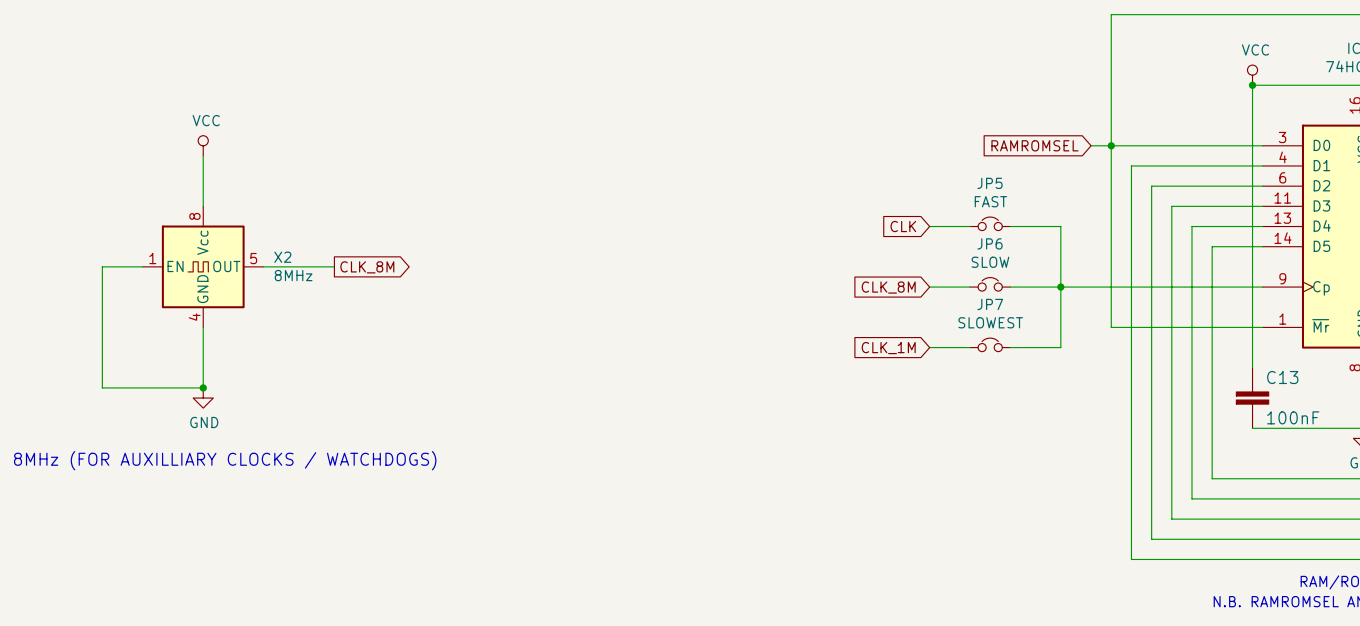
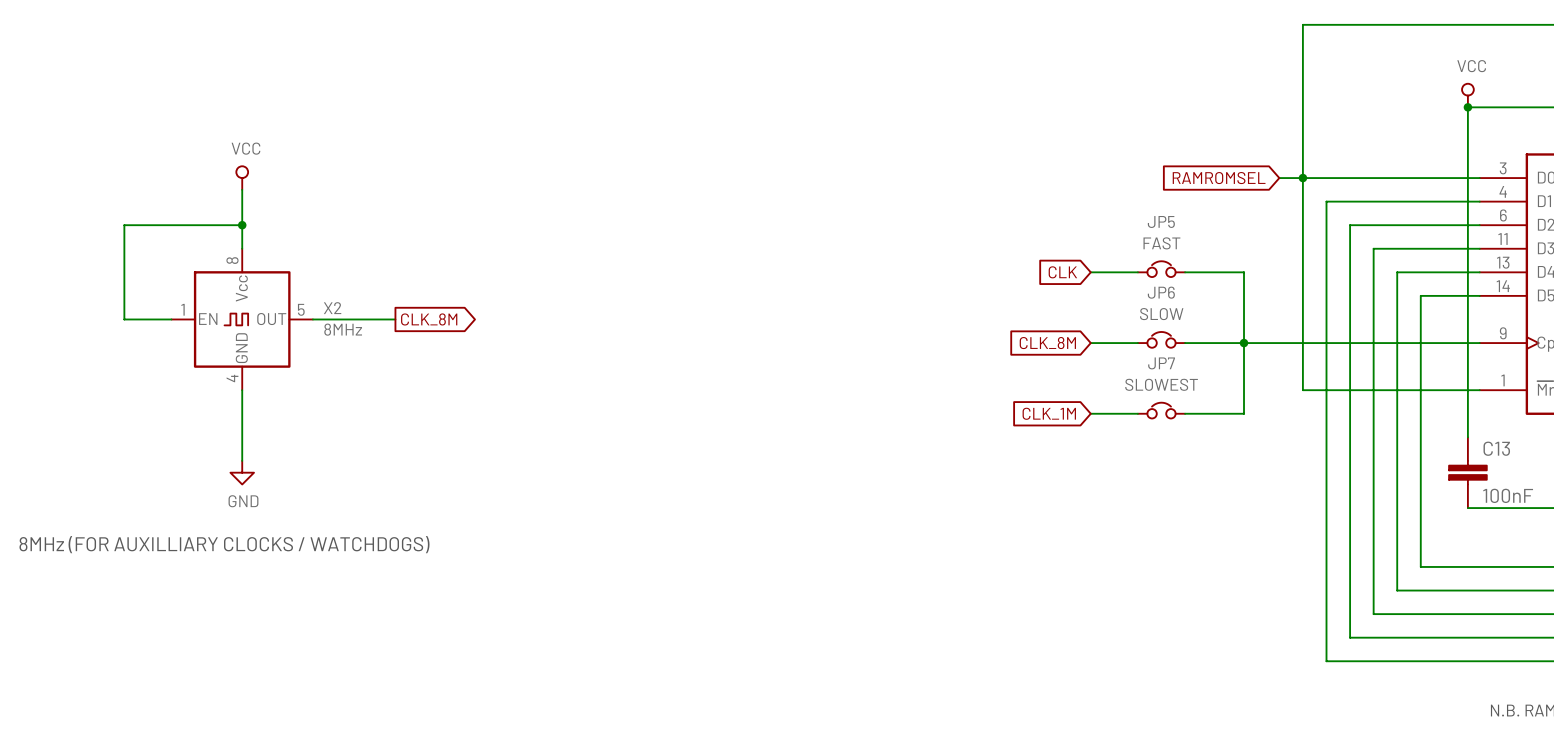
junction: none -> (242, 225)
wire: (102, 266) (102, 387) (203, 387) -> (124, 319) (124, 225) (242, 225)
junction: (203, 387) -> none

